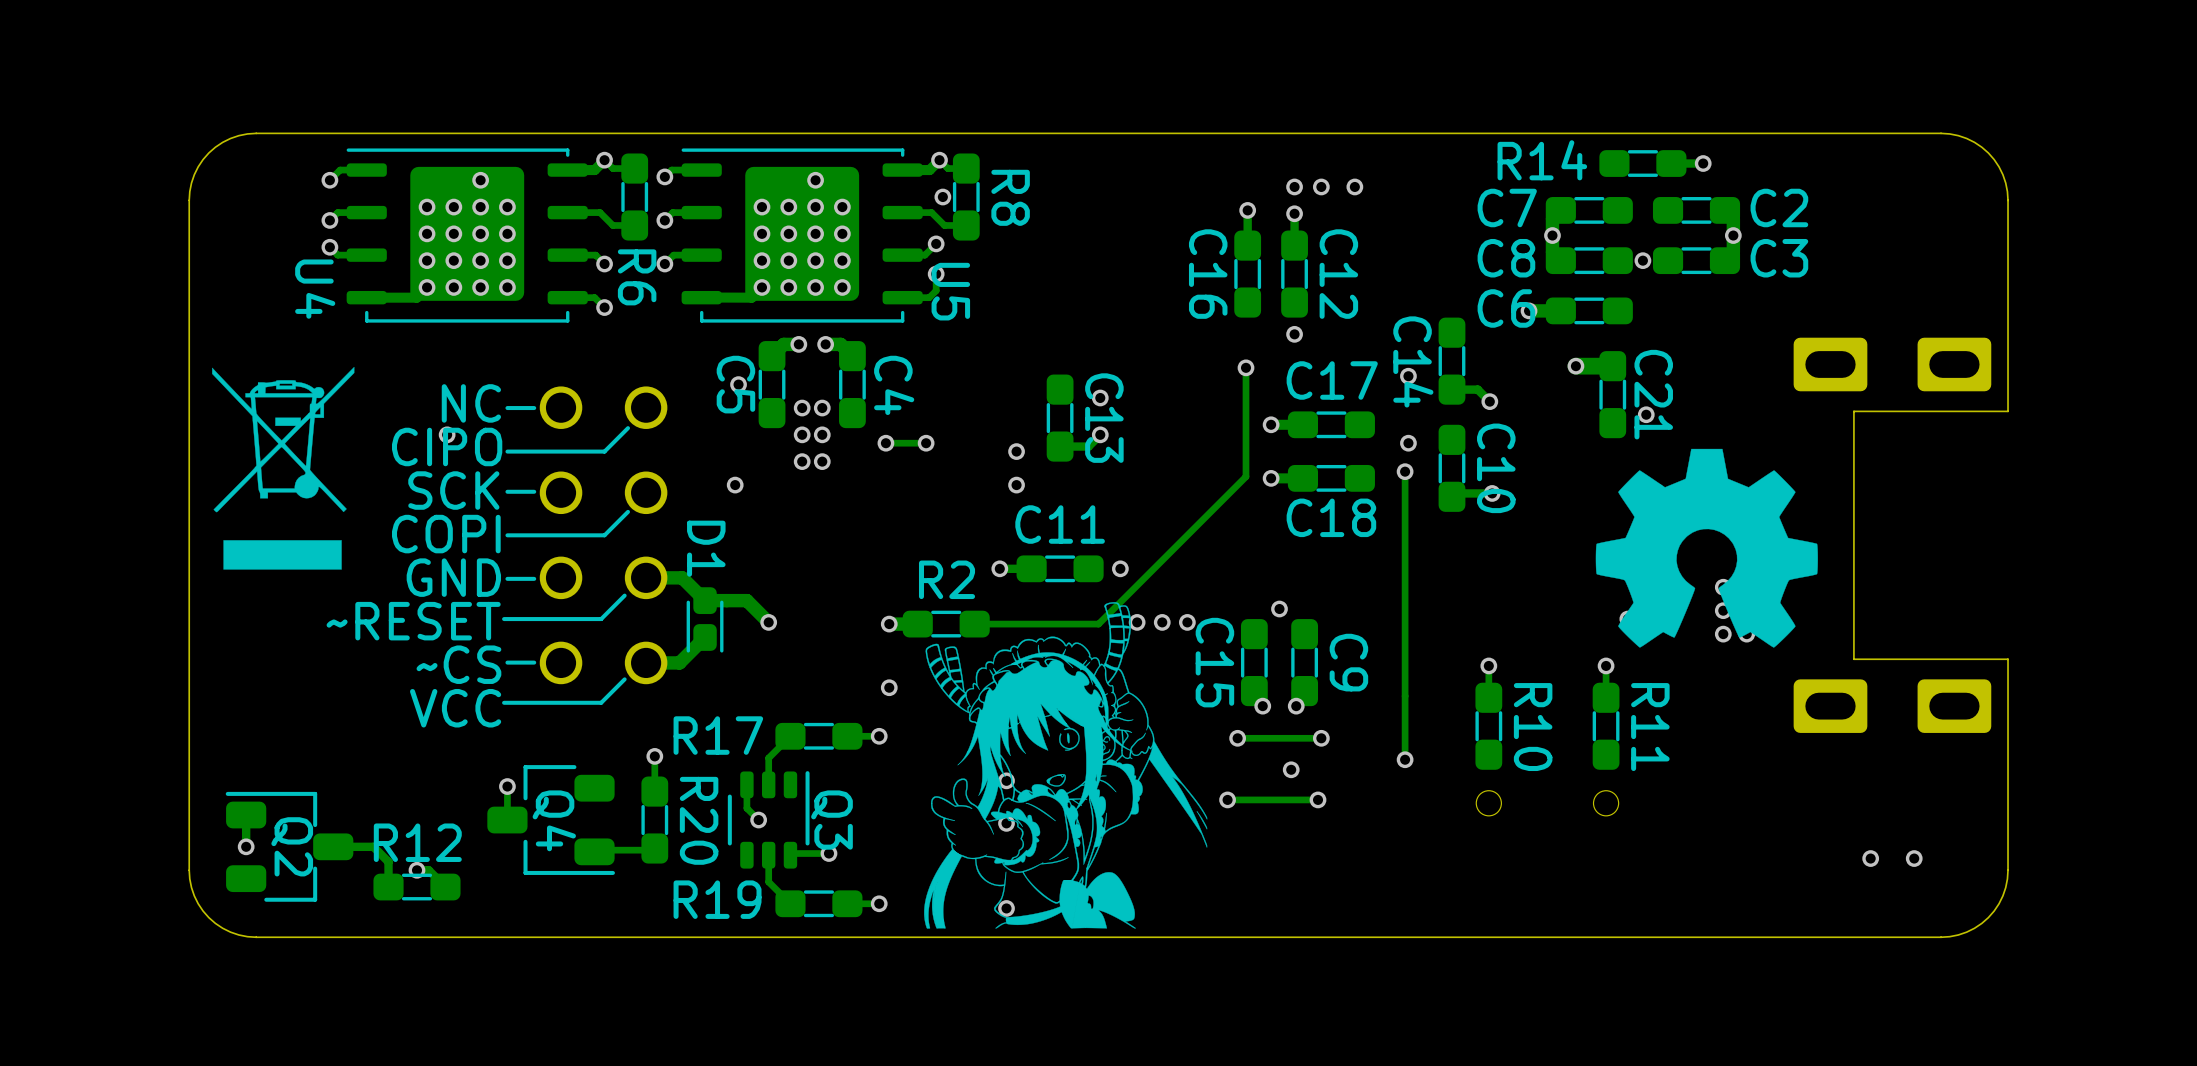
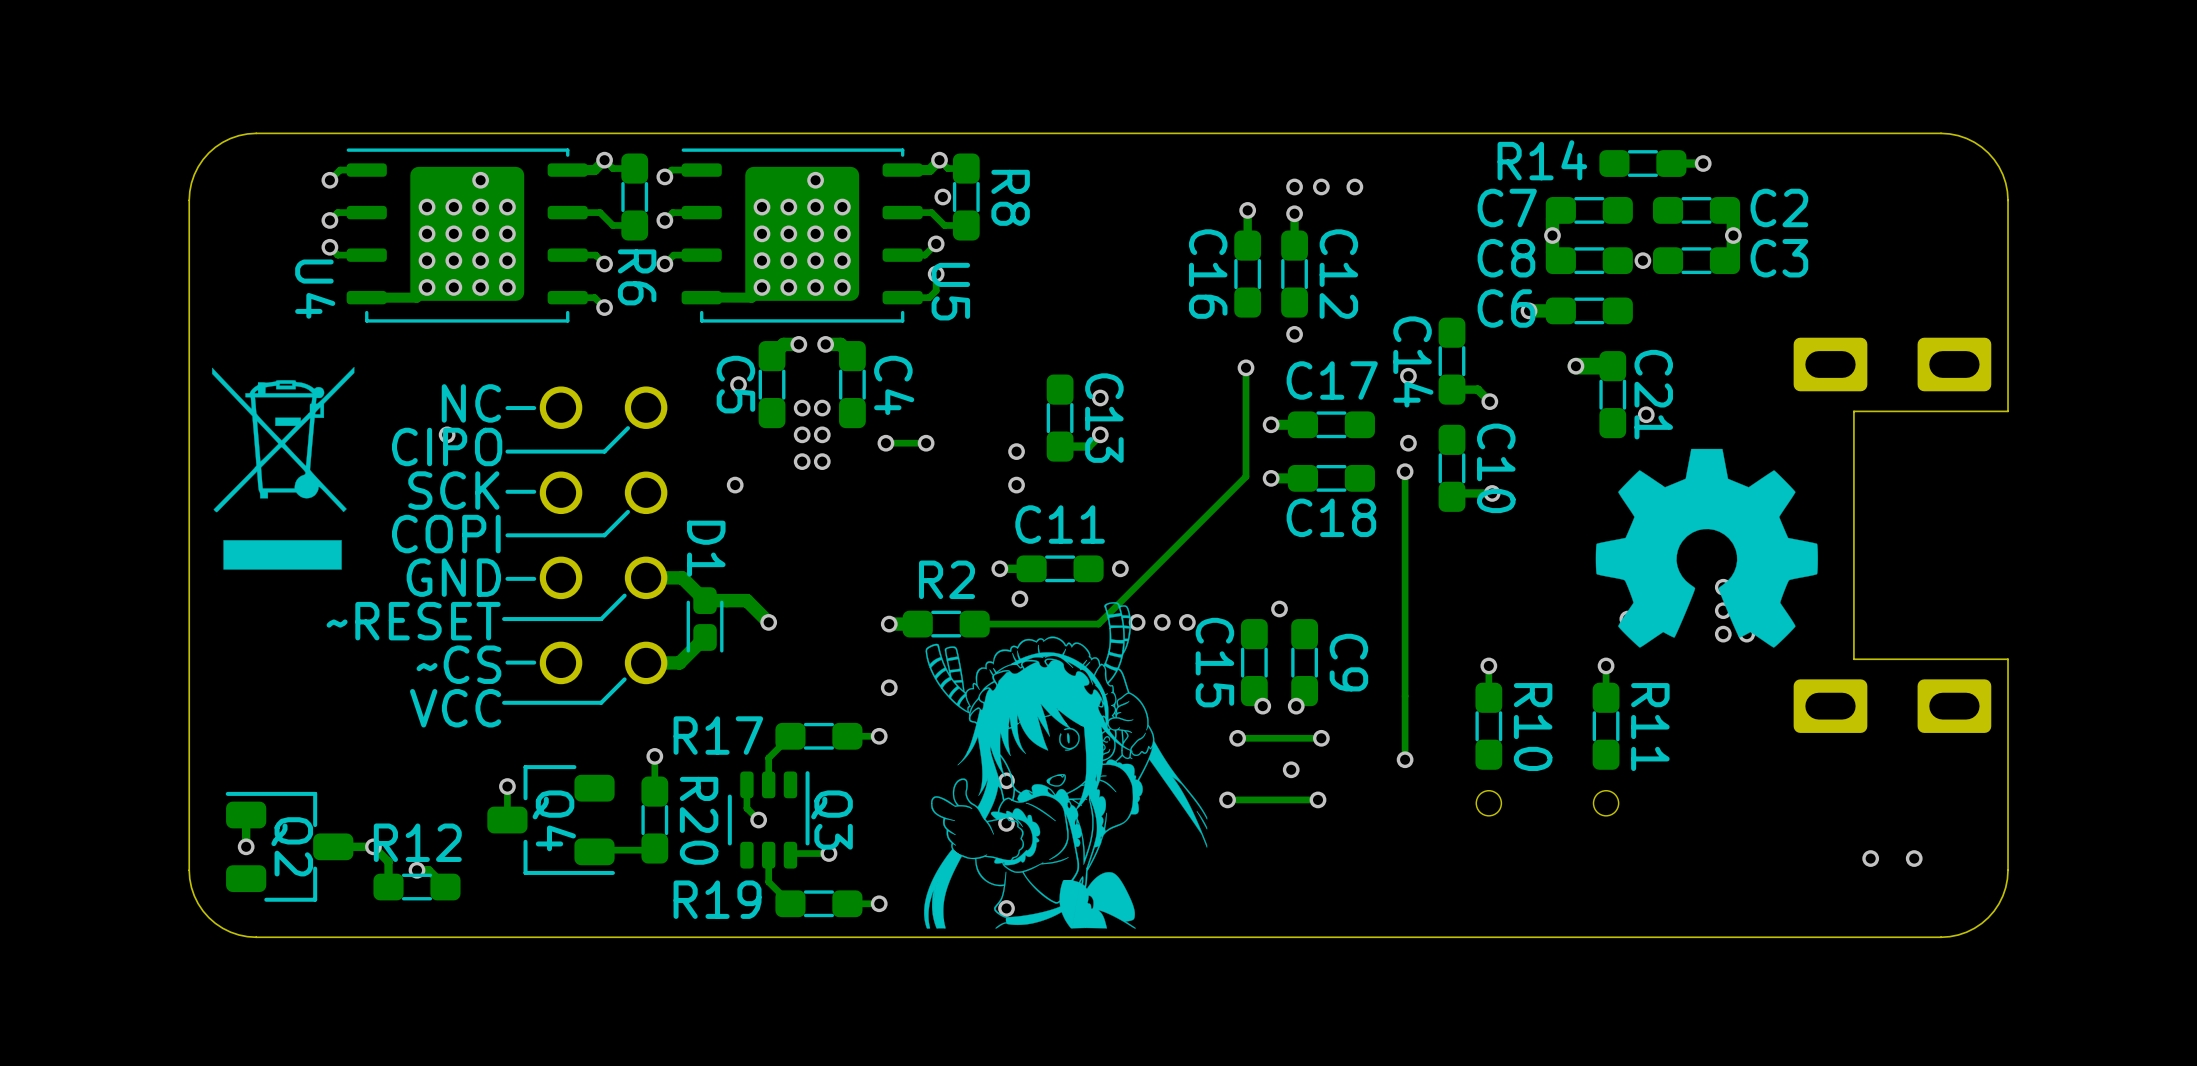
via: none -> (1019, 598)
via: none -> (373, 846)

